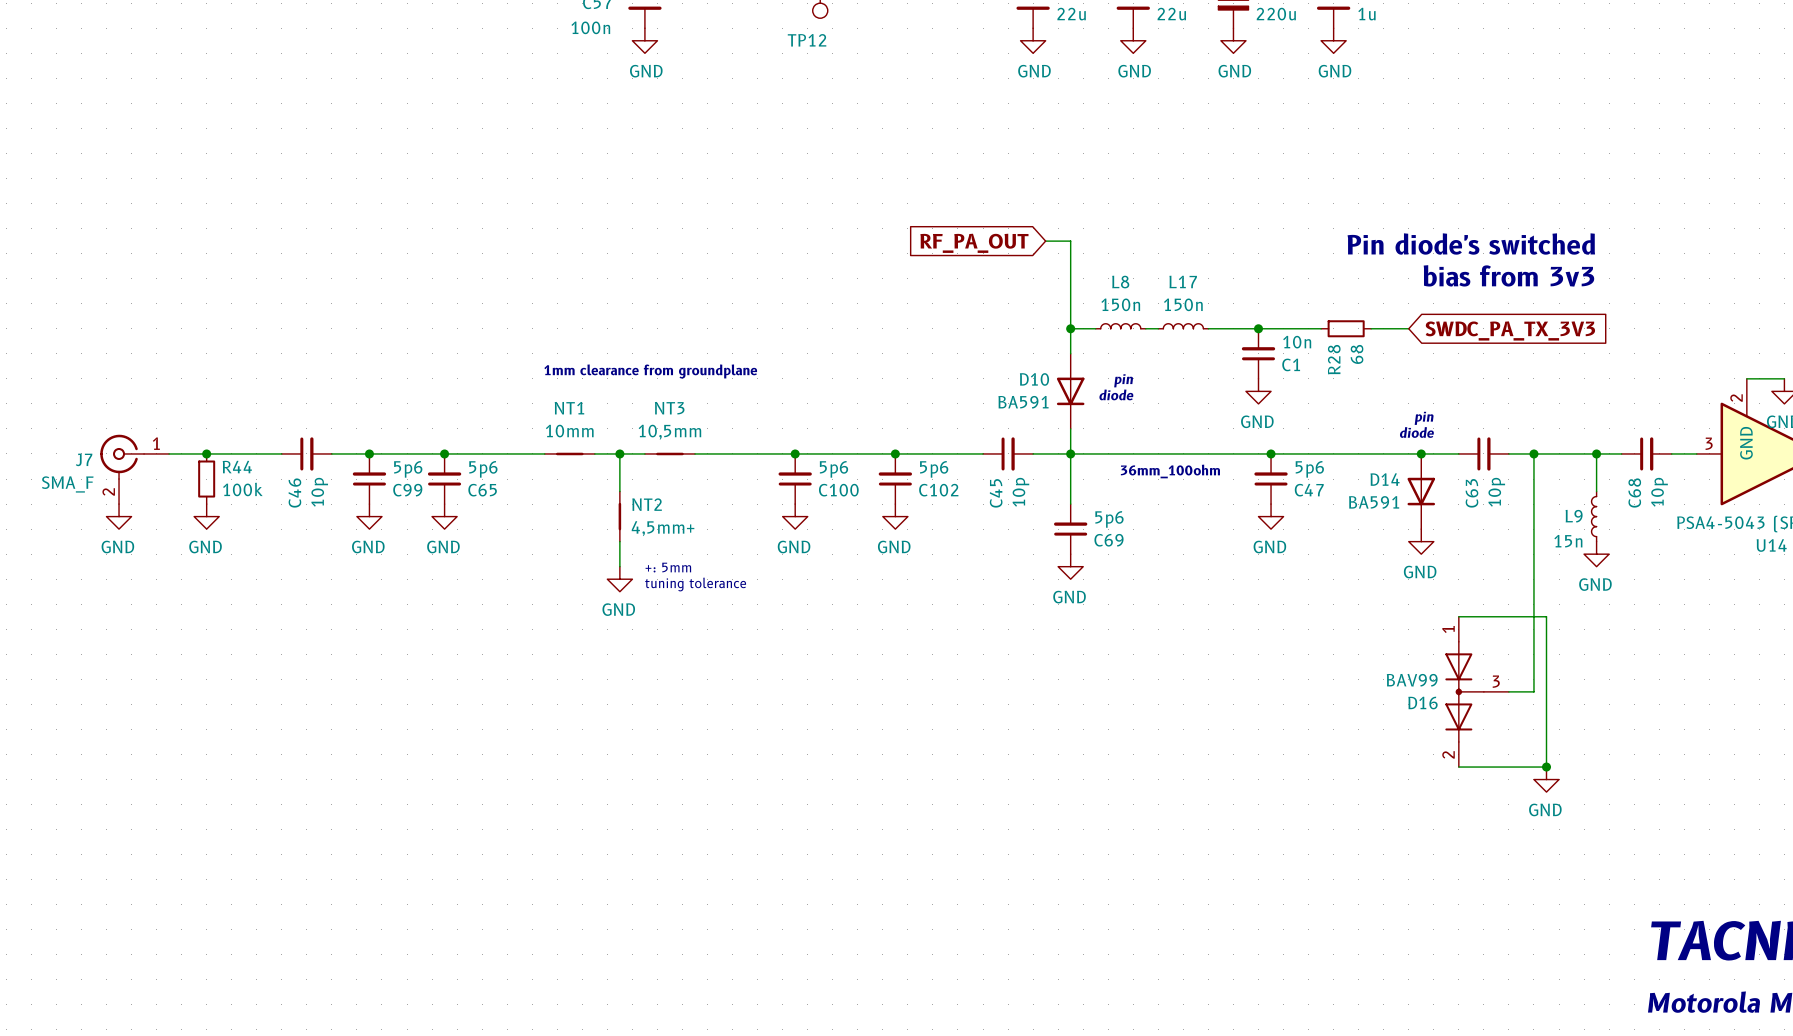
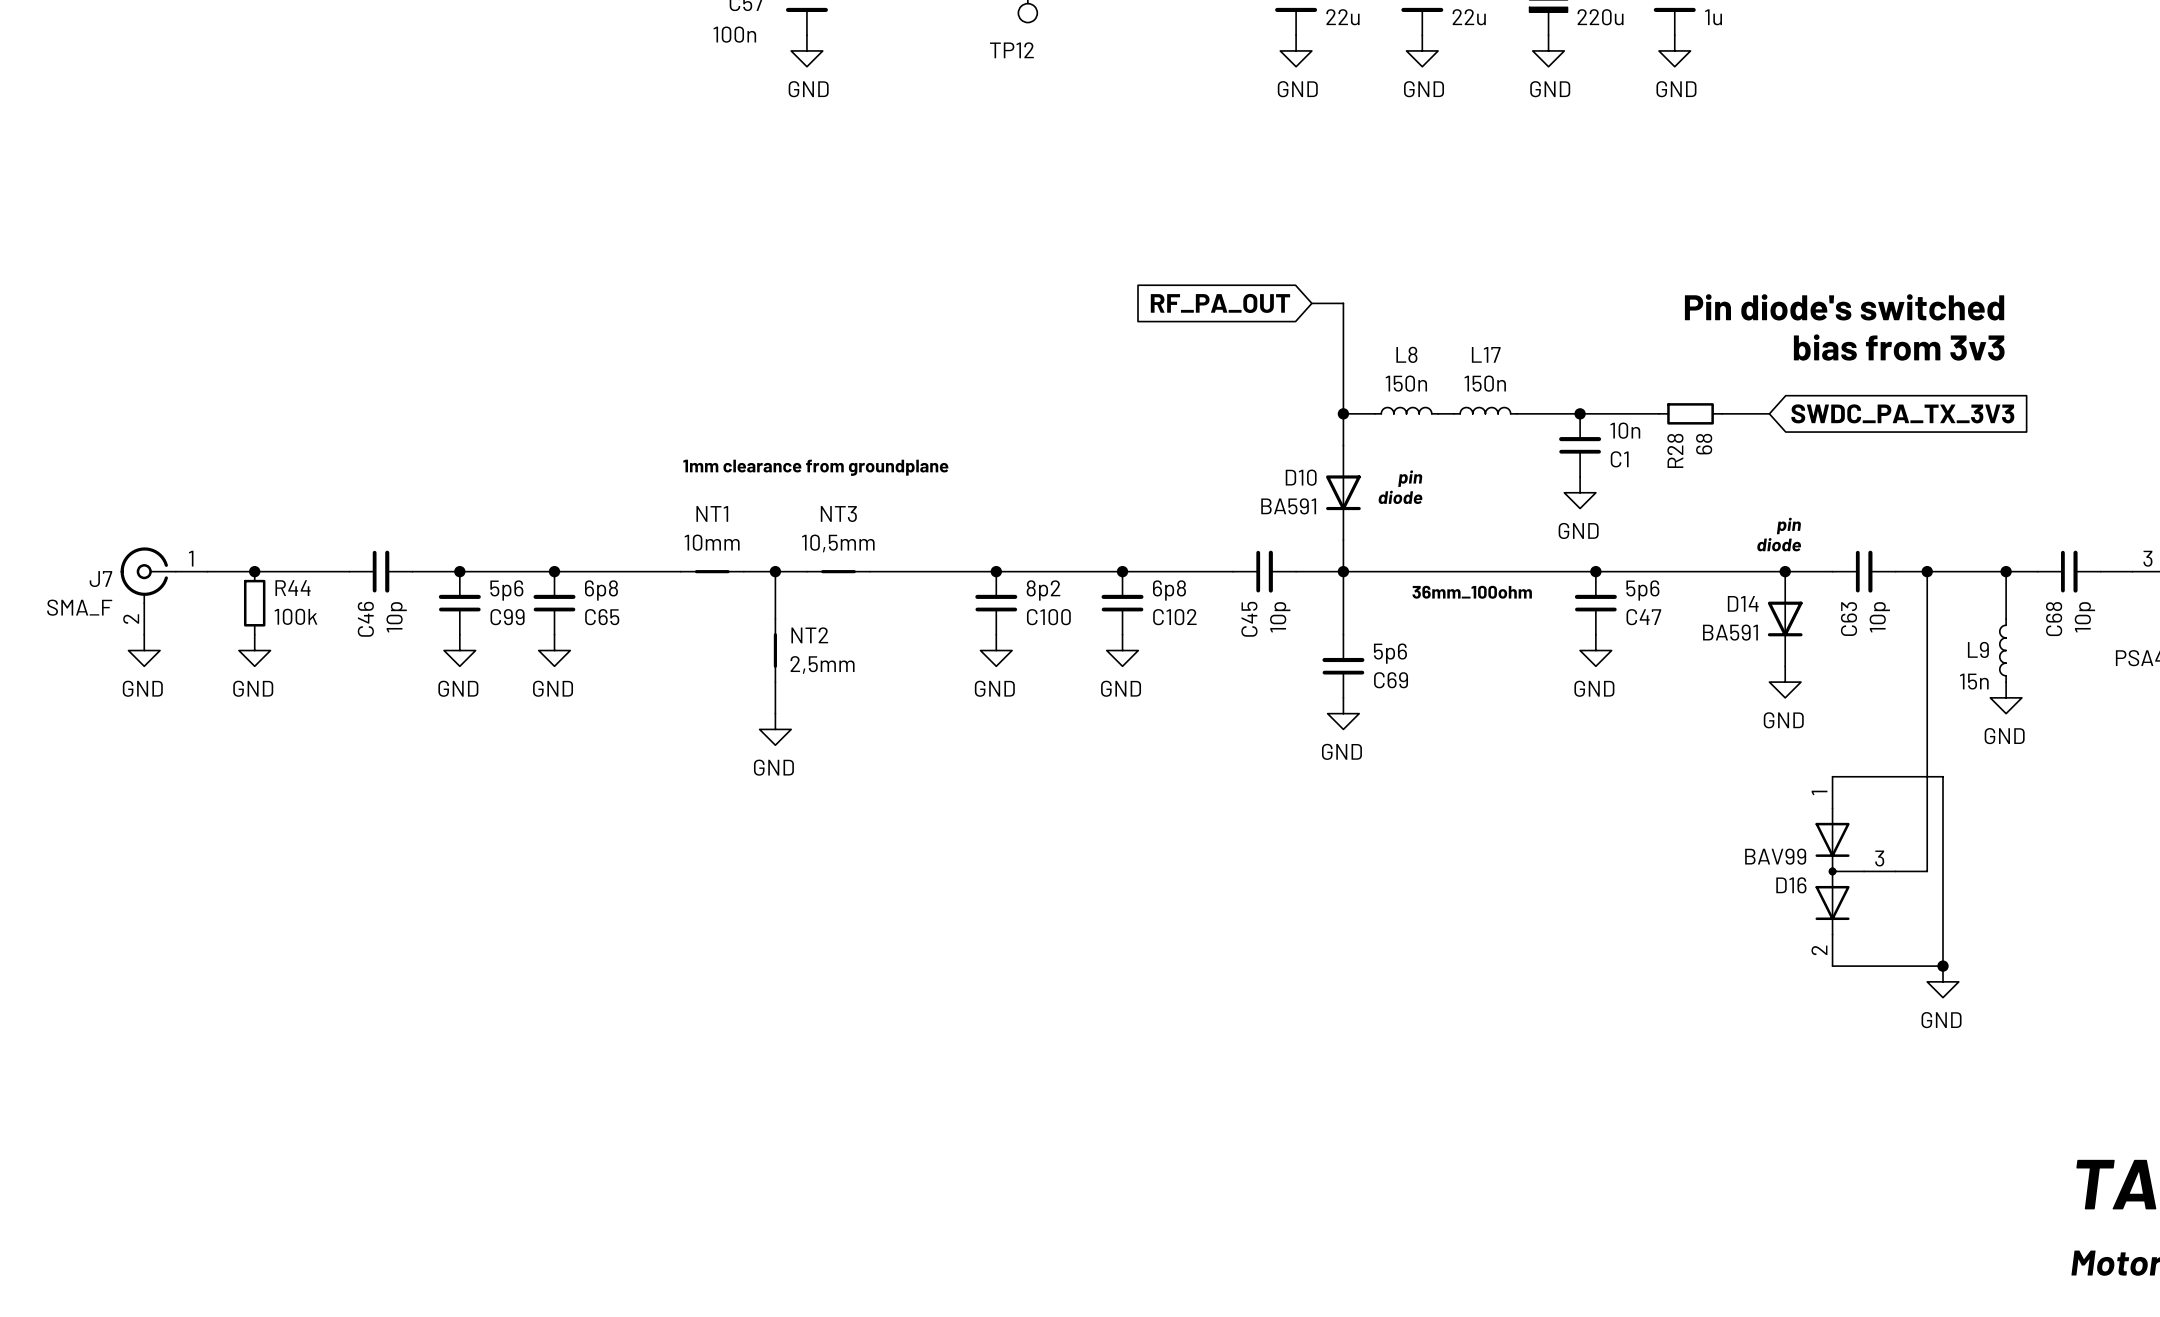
C65 value: 5p6 (483, 469) -> 6p8 (601, 590)
C100 value: 5p6 (833, 469) -> 8p2 (1043, 590)
C102 value: 5p6 (934, 469) -> 6p8 (1169, 590)
NT2 value: 4,5mm+ (663, 528) -> 2,5mm (822, 664)
text: +: 5mm (668, 567) -> none
text: tuning tolerance (695, 584) -> none

